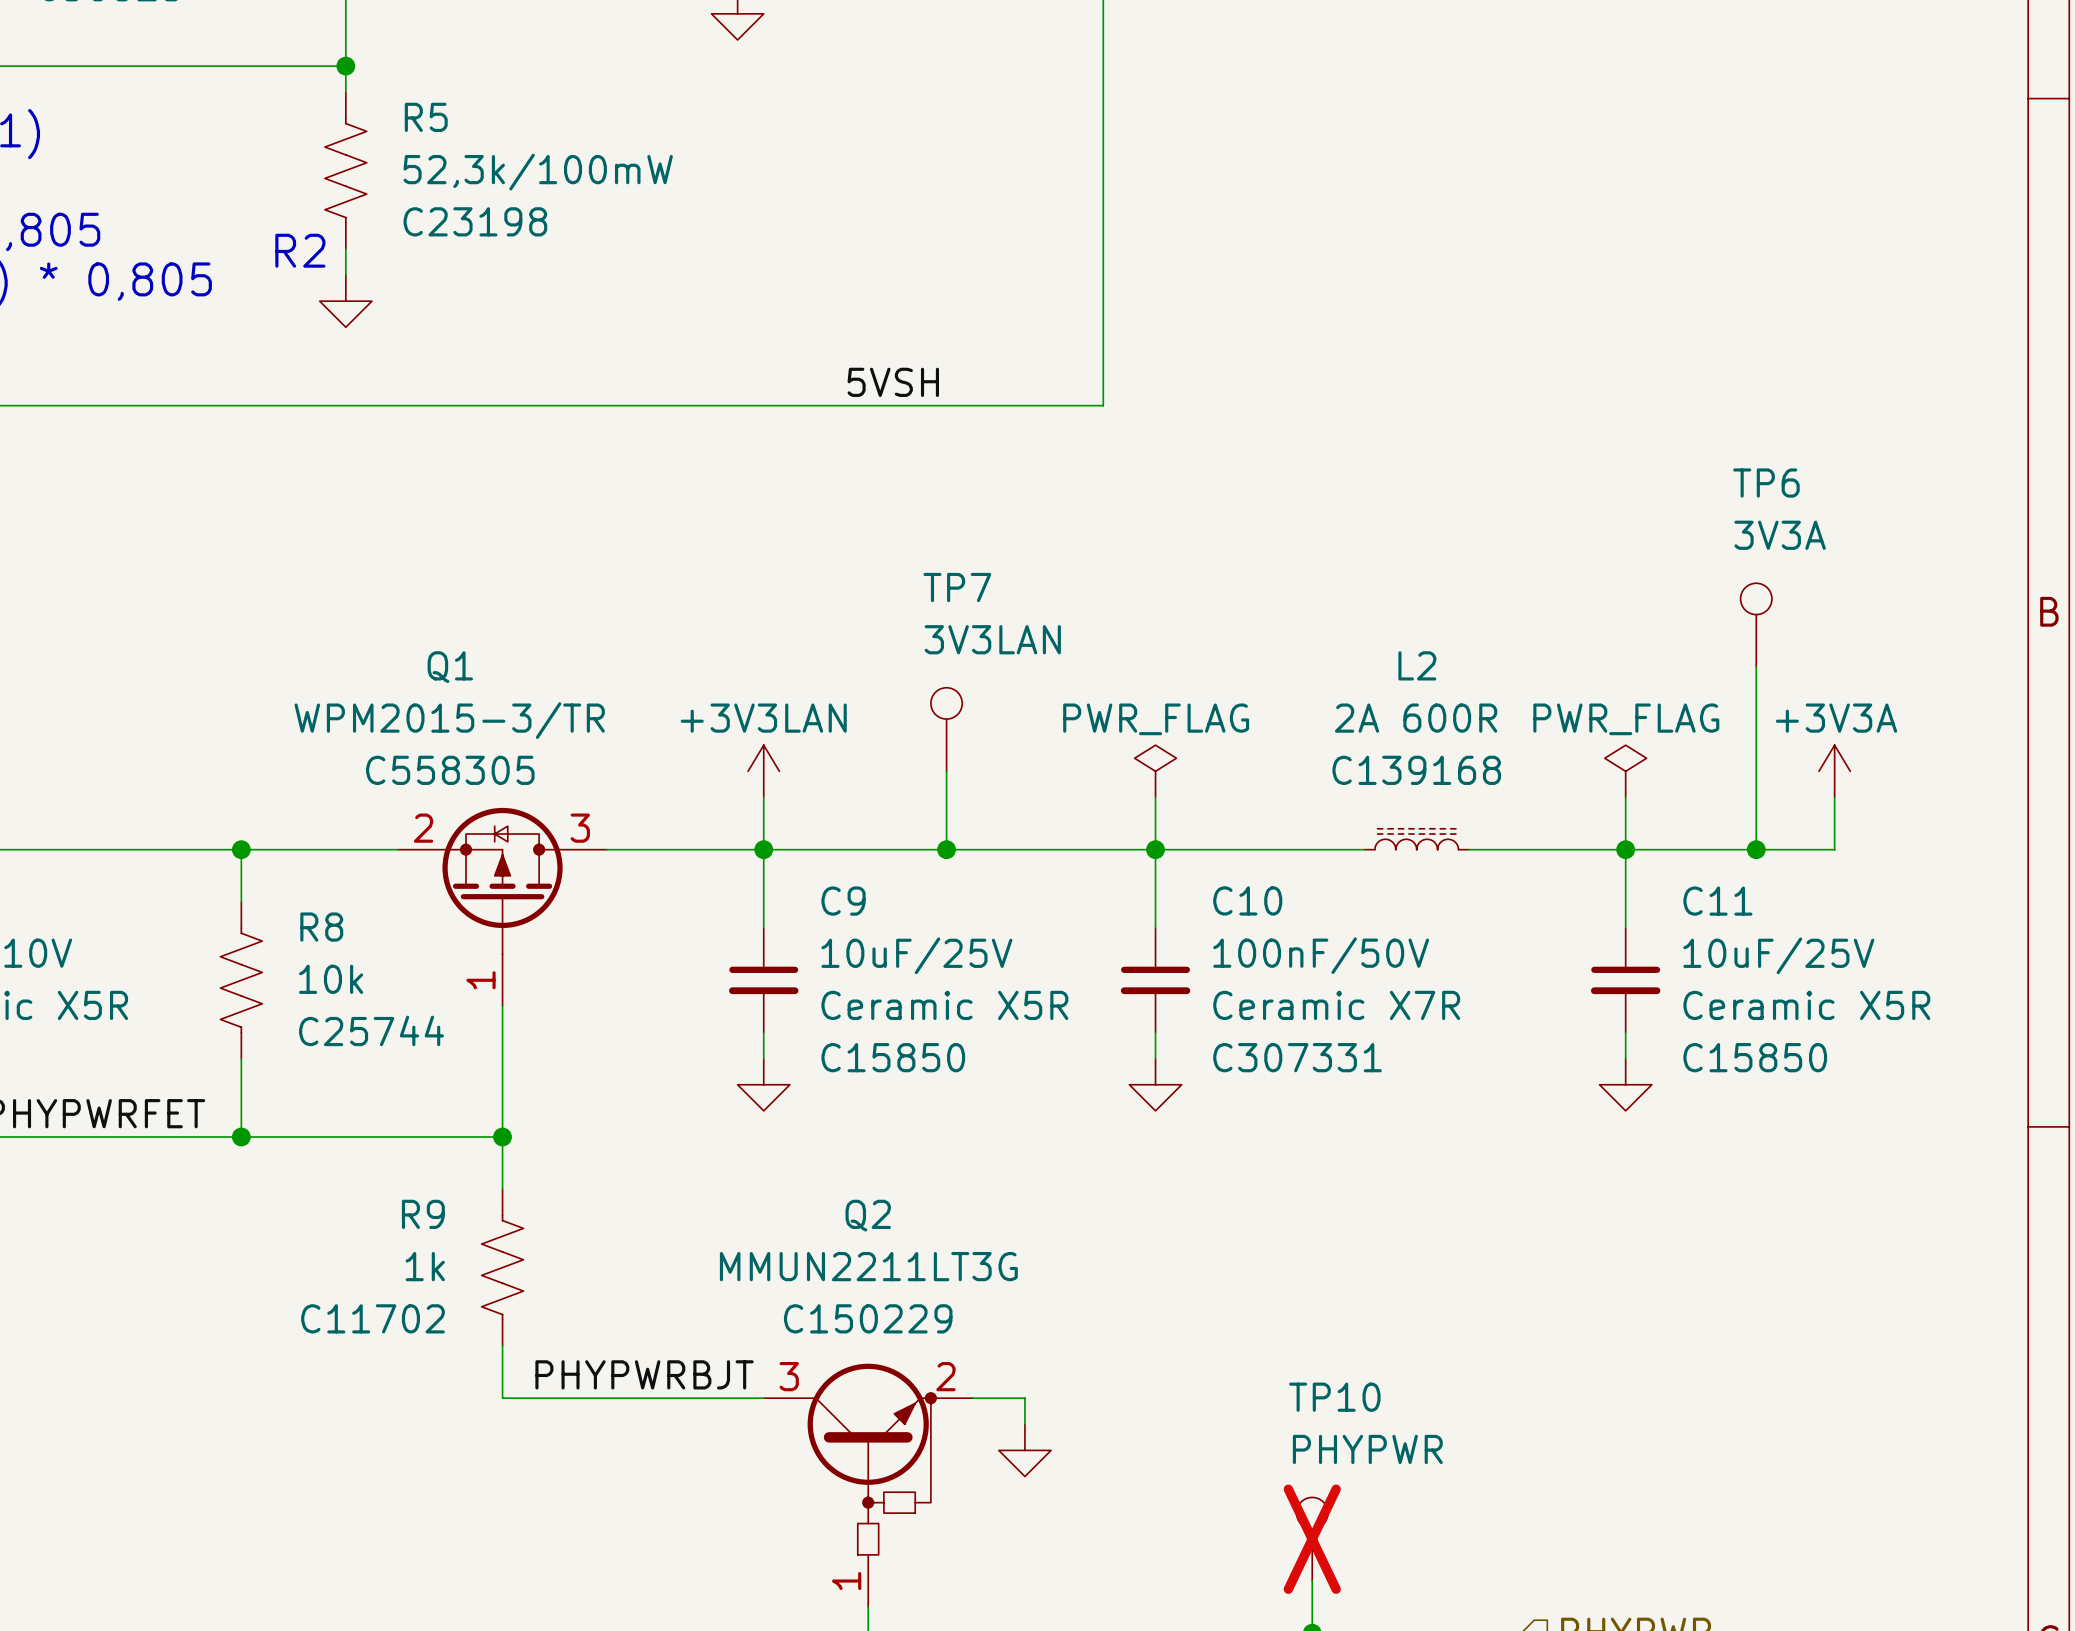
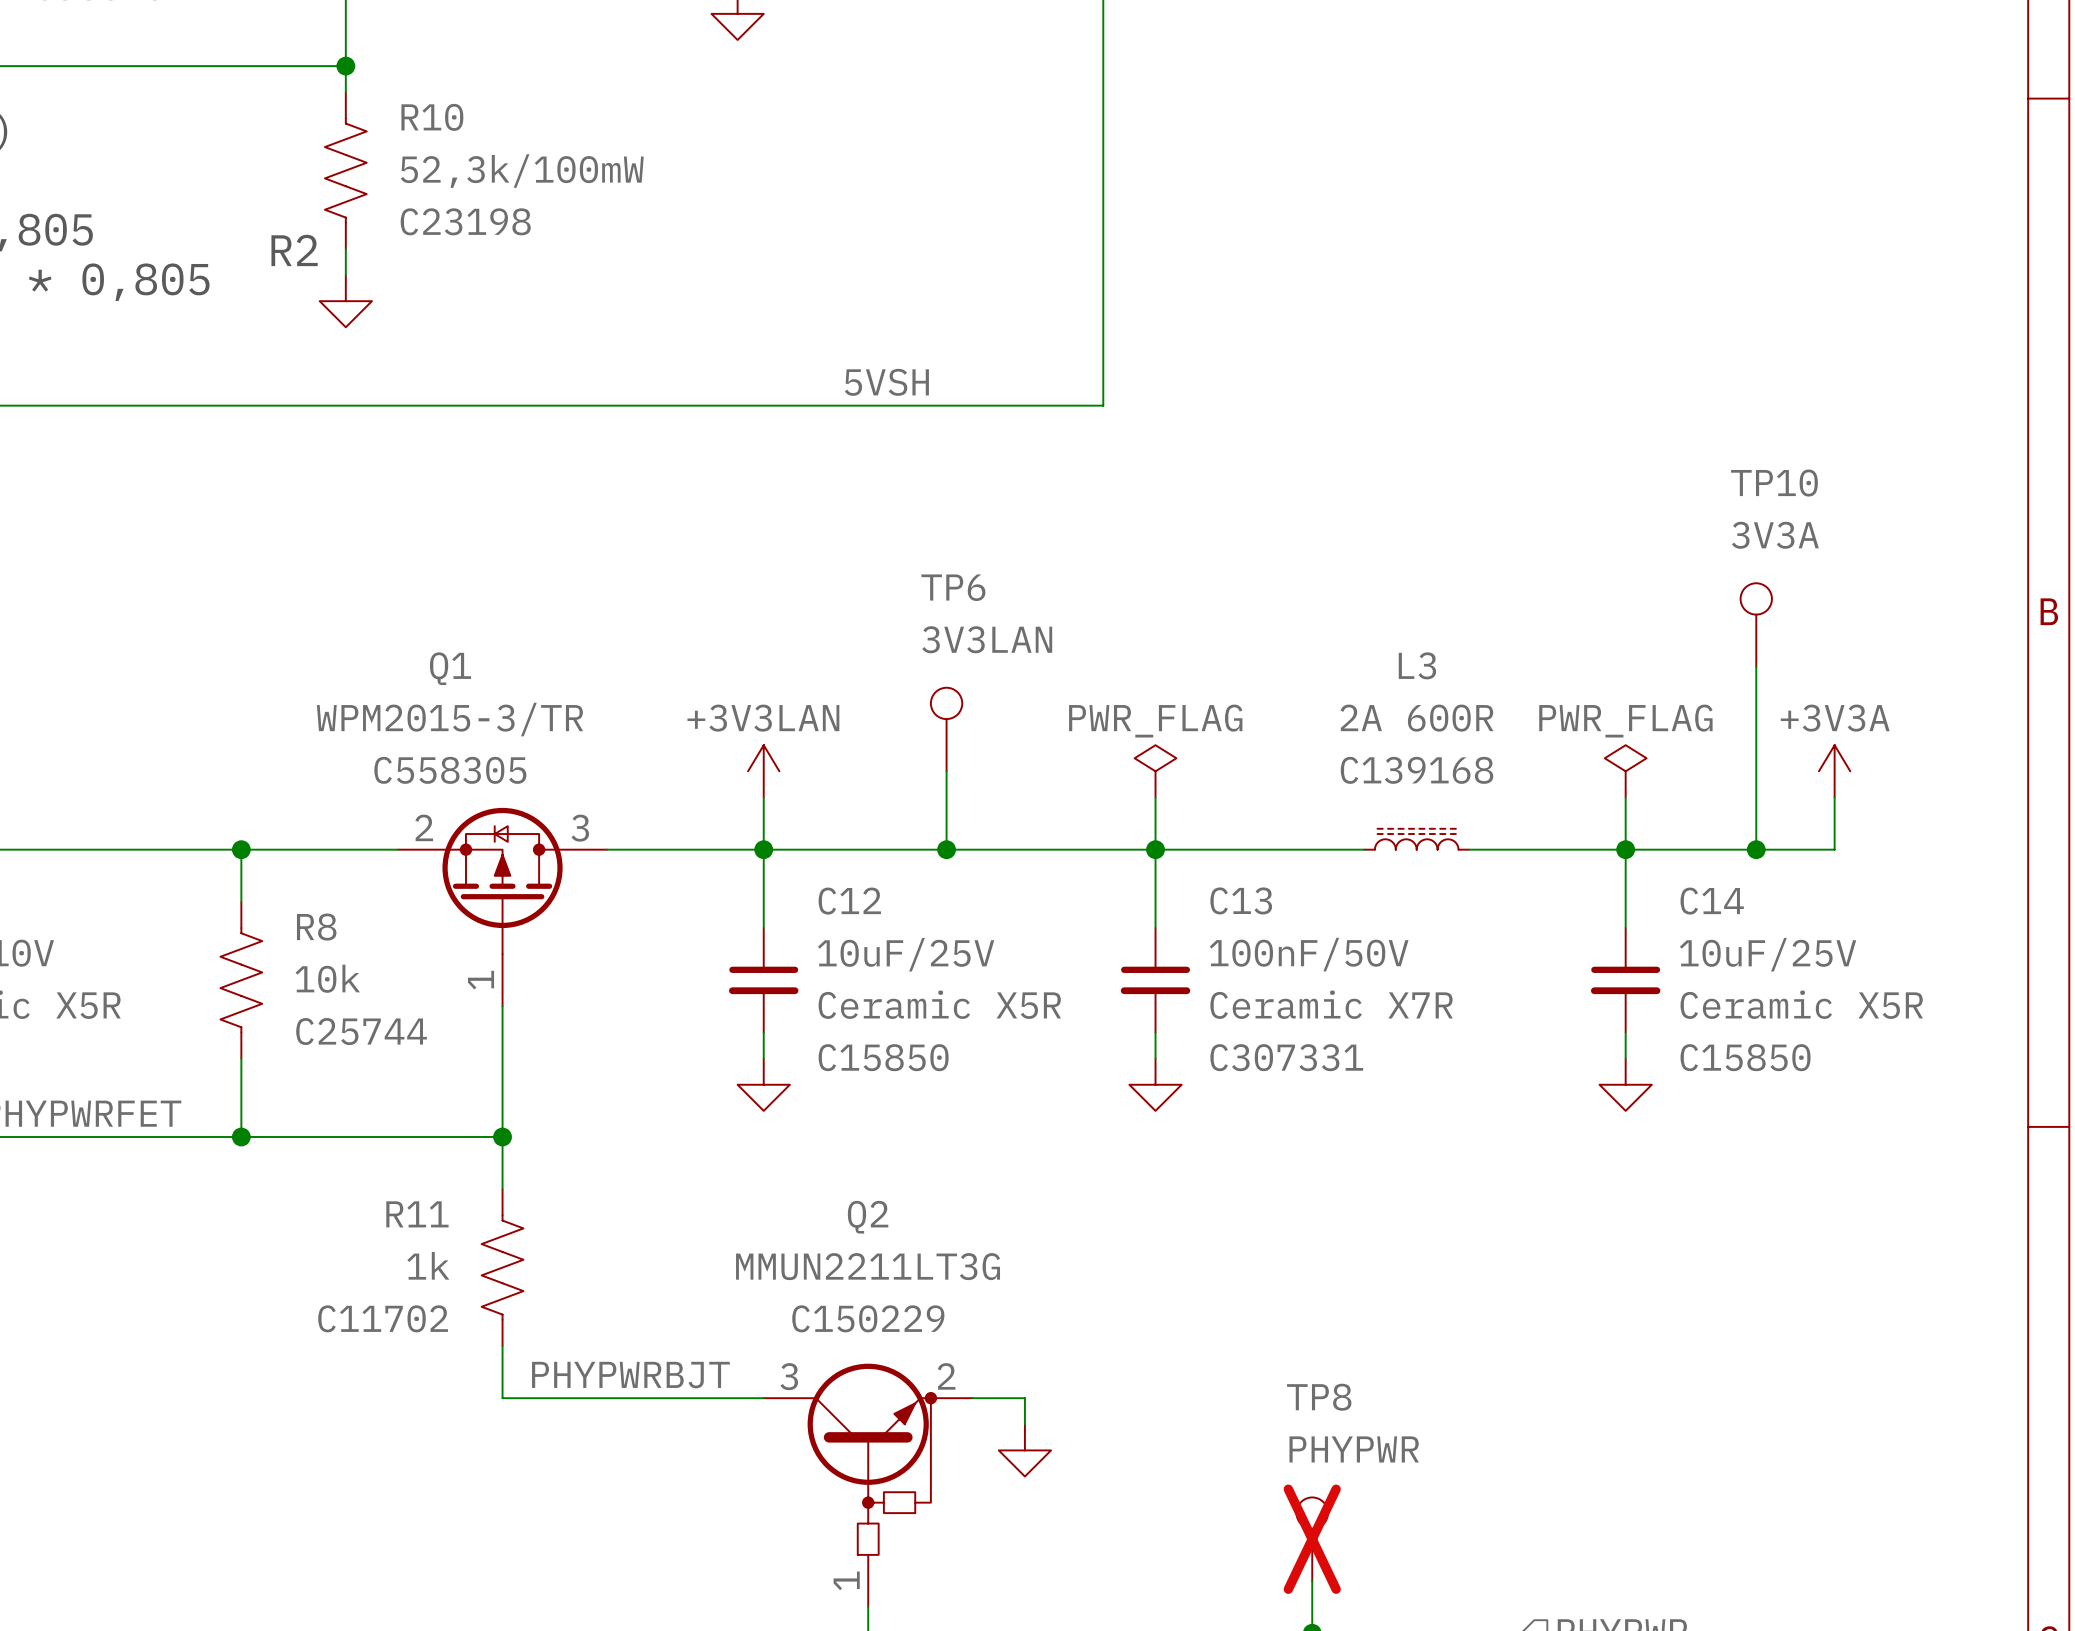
R5 name: R5 (426, 117) -> R10 (432, 117)
TP6 name: TP6 (1766, 483) -> TP10 (1774, 483)
TP7 name: TP7 (957, 587) -> TP6 (953, 587)
L2 name: L2 (1417, 665) -> L3 (1417, 665)
C10 name: C10 (1247, 900) -> C13 (1241, 900)
C9 name: C9 (843, 901) -> C12 (849, 901)
C11 name: C11 (1717, 901) -> C14 (1712, 901)
R9 name: R9 (423, 1214) -> R11 (417, 1214)
TP10 name: TP10 (1334, 1397) -> TP8 (1319, 1397)

